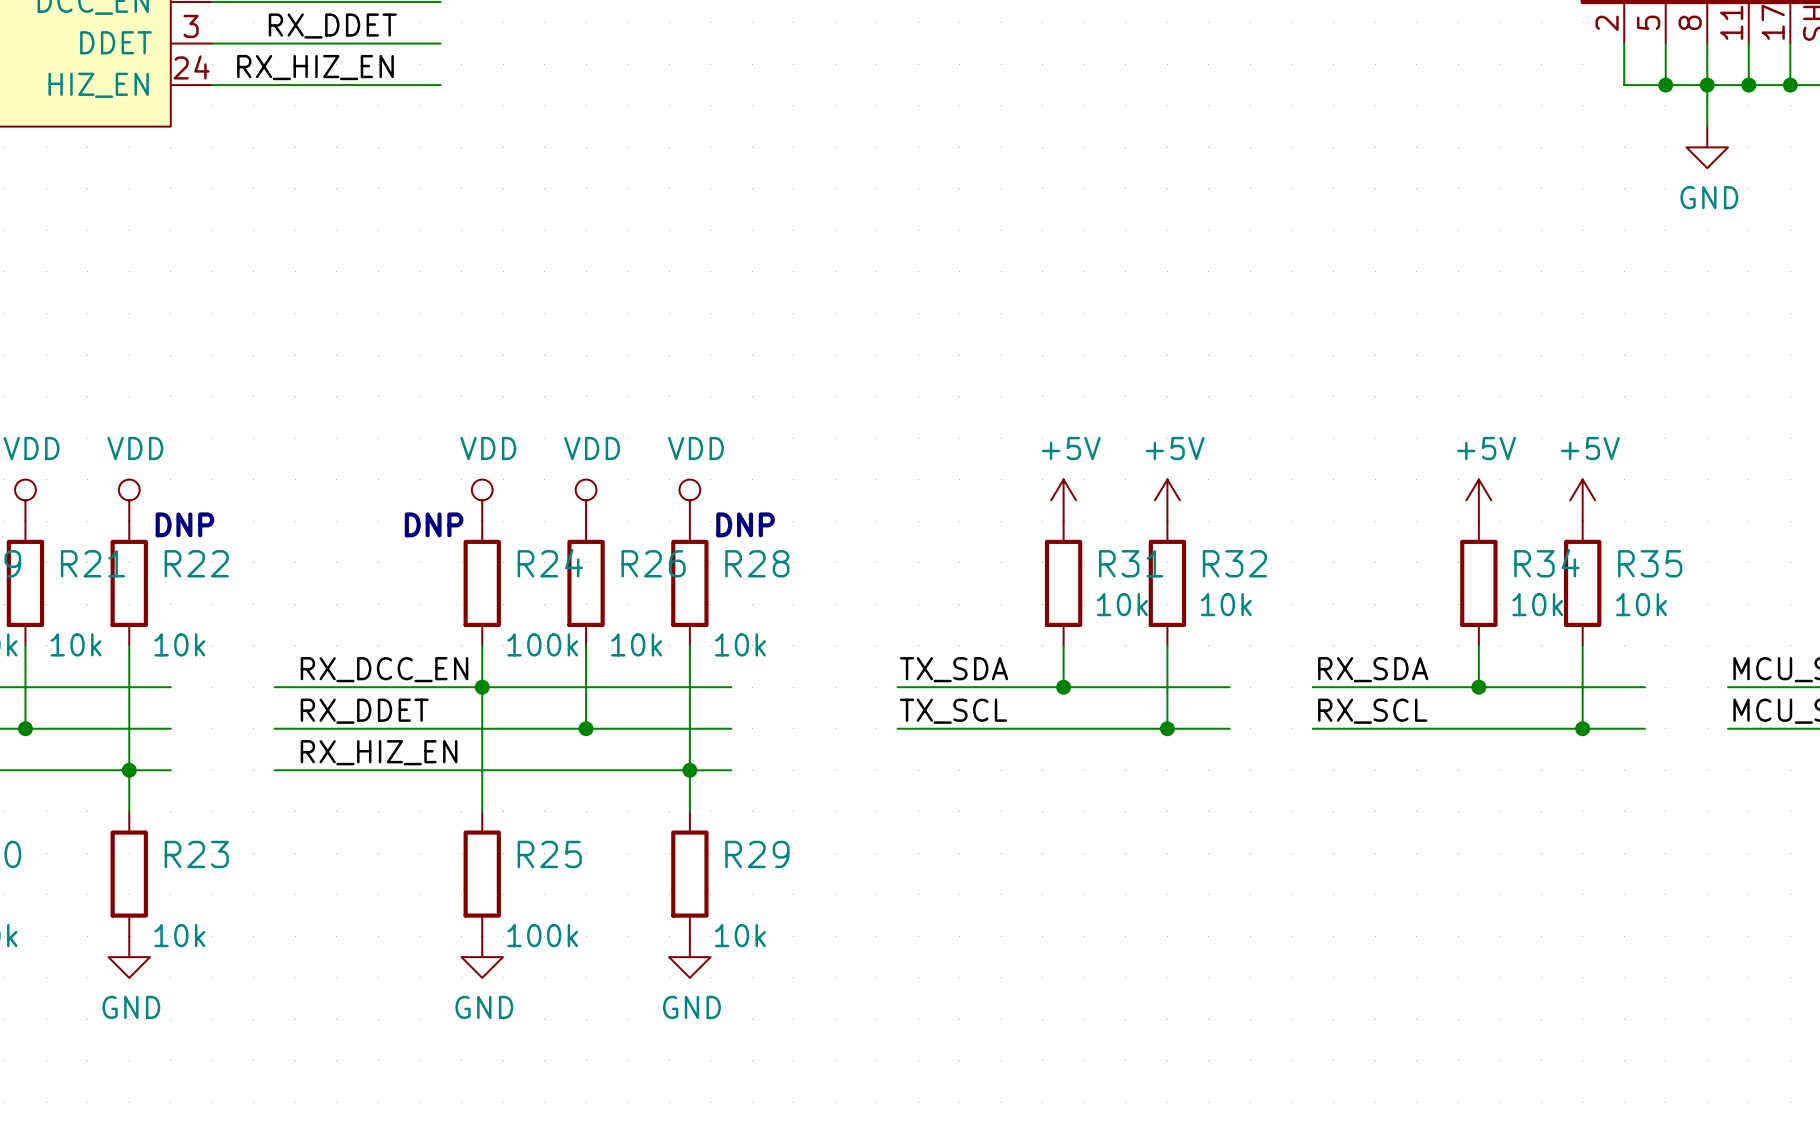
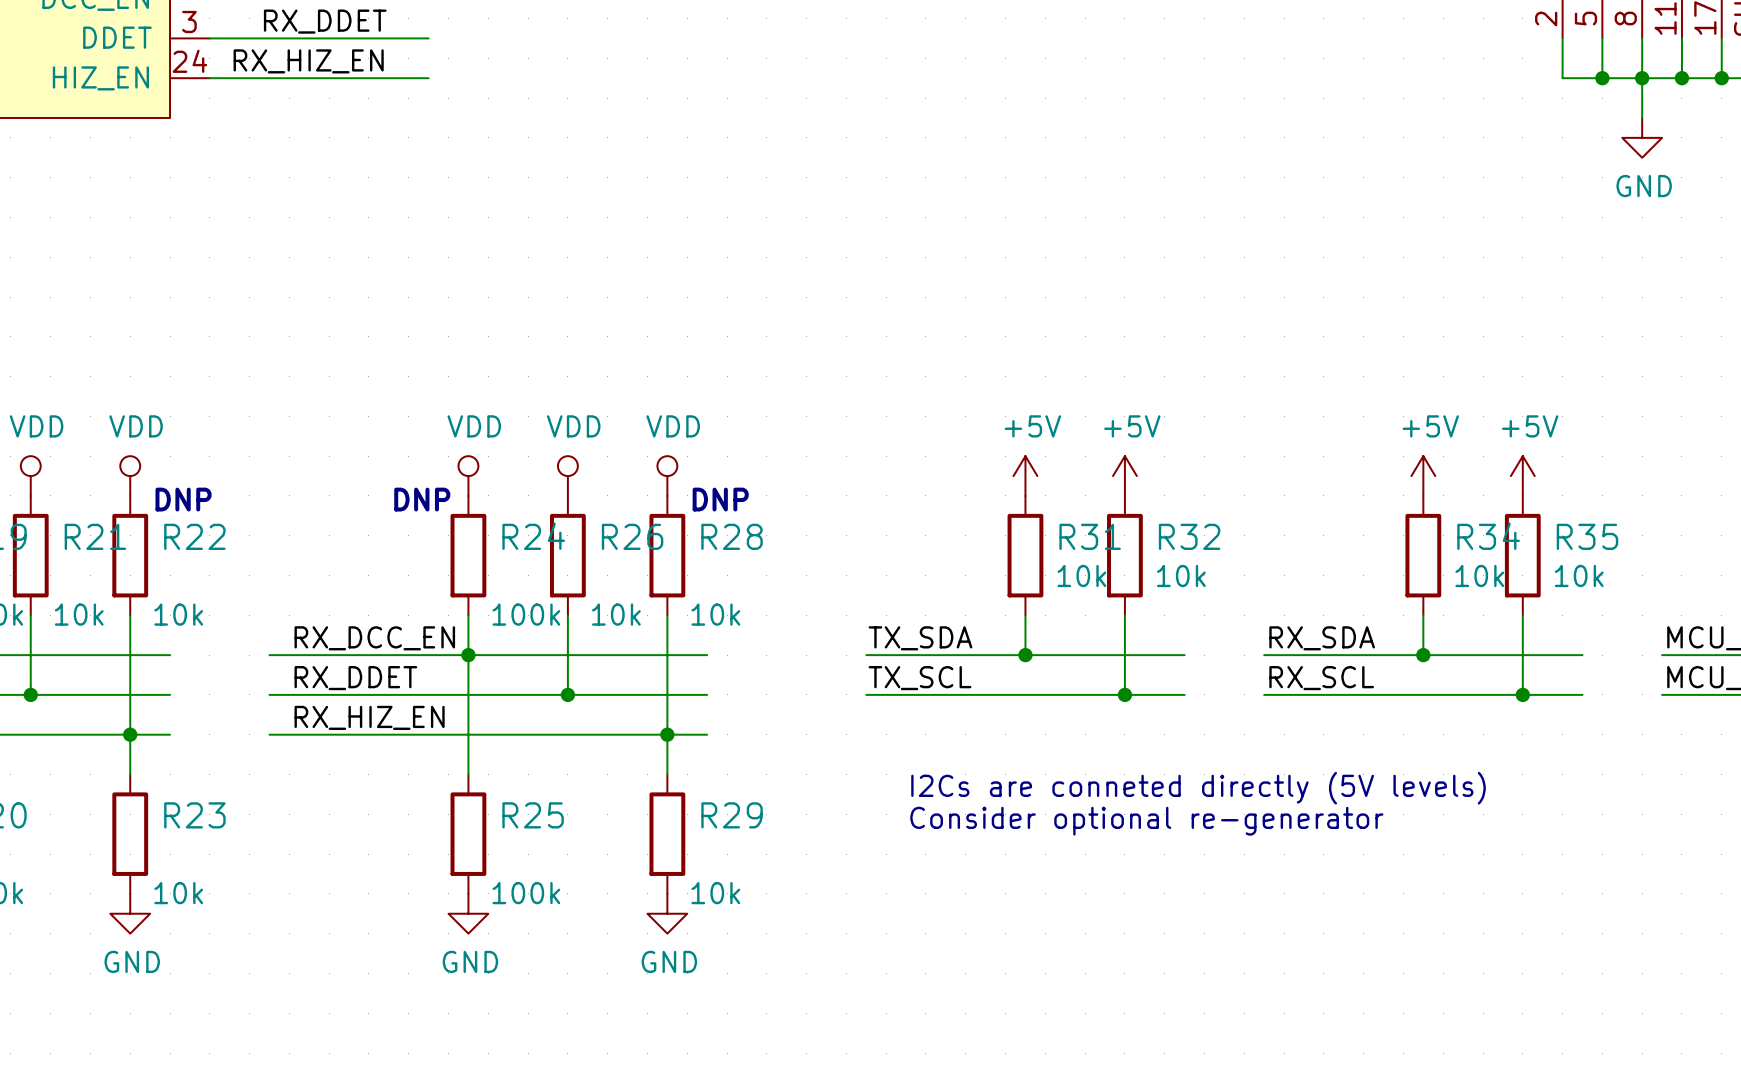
text: none -> I2Cs are conneted directly (5V levels) (1198, 788)
text: none -> Consider optional re-generator (1146, 821)

